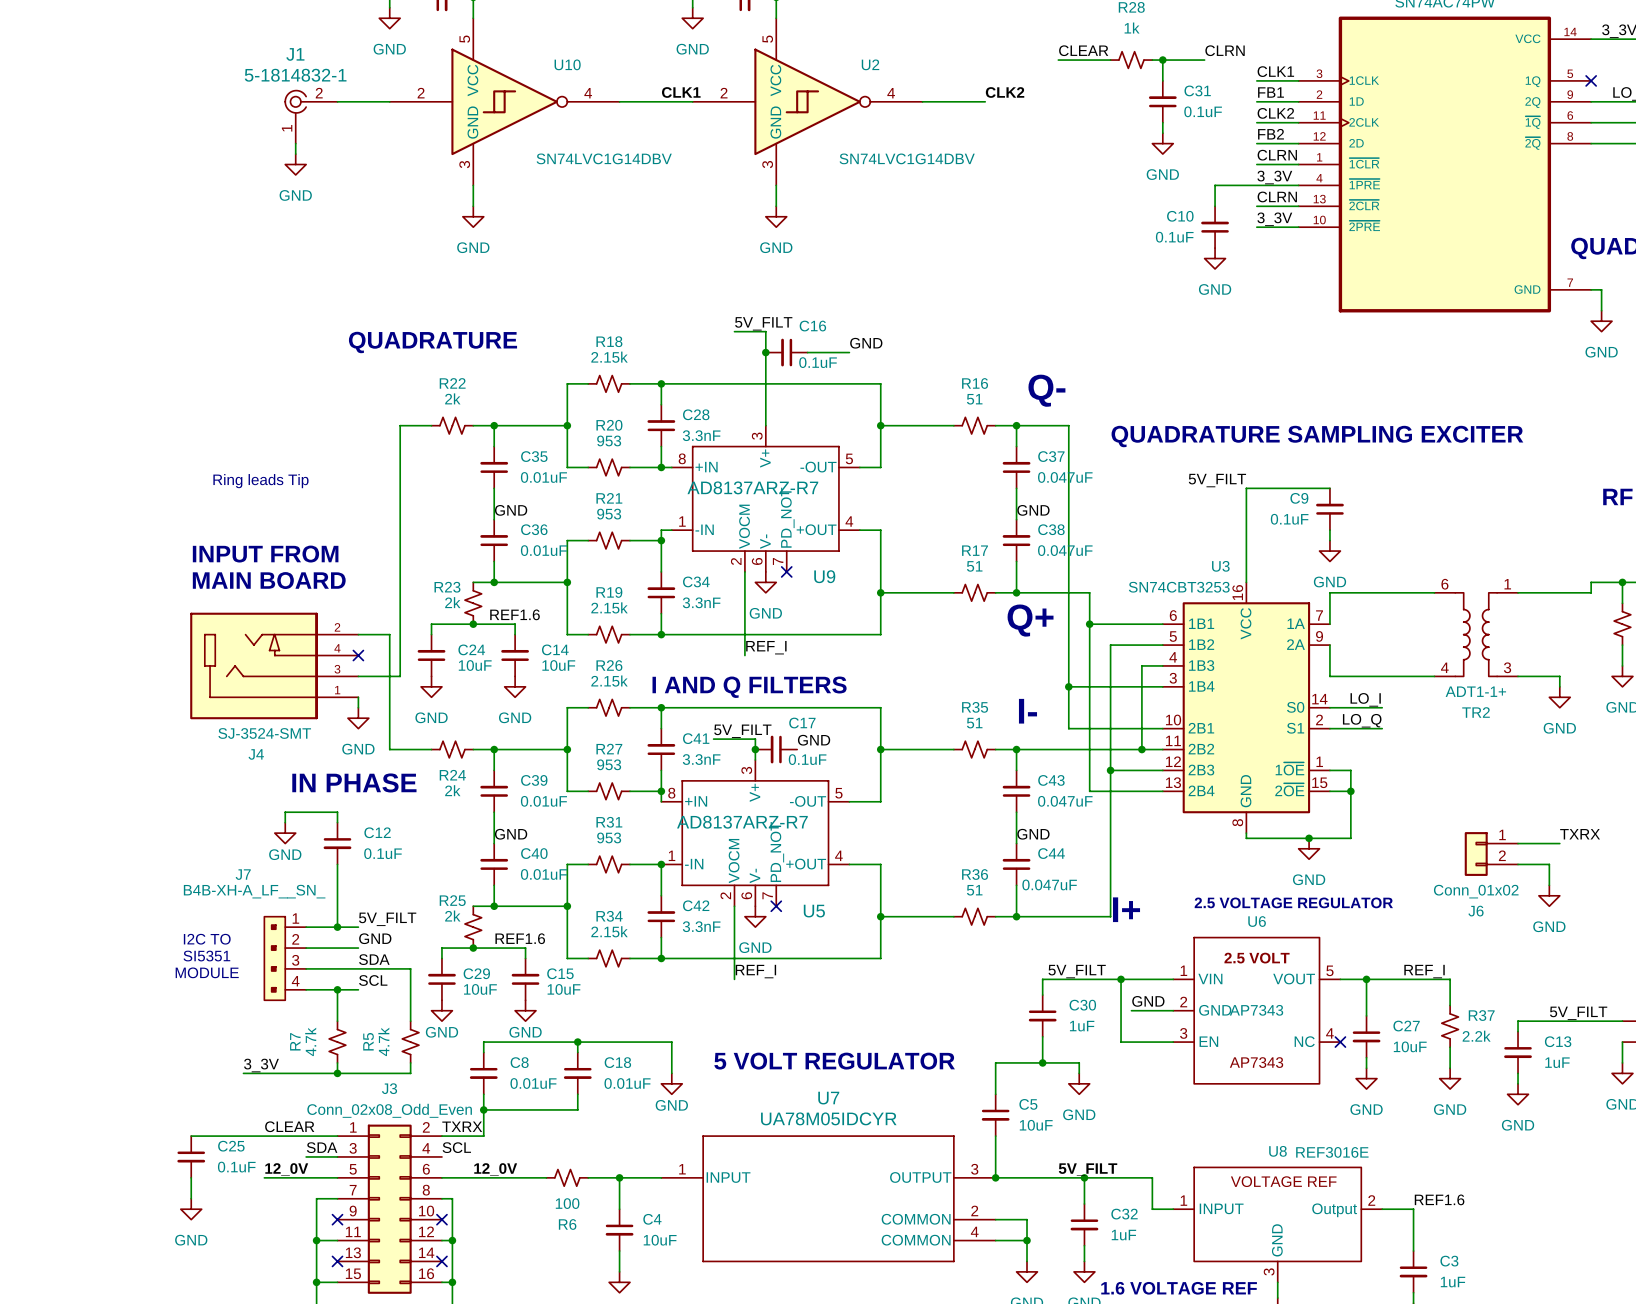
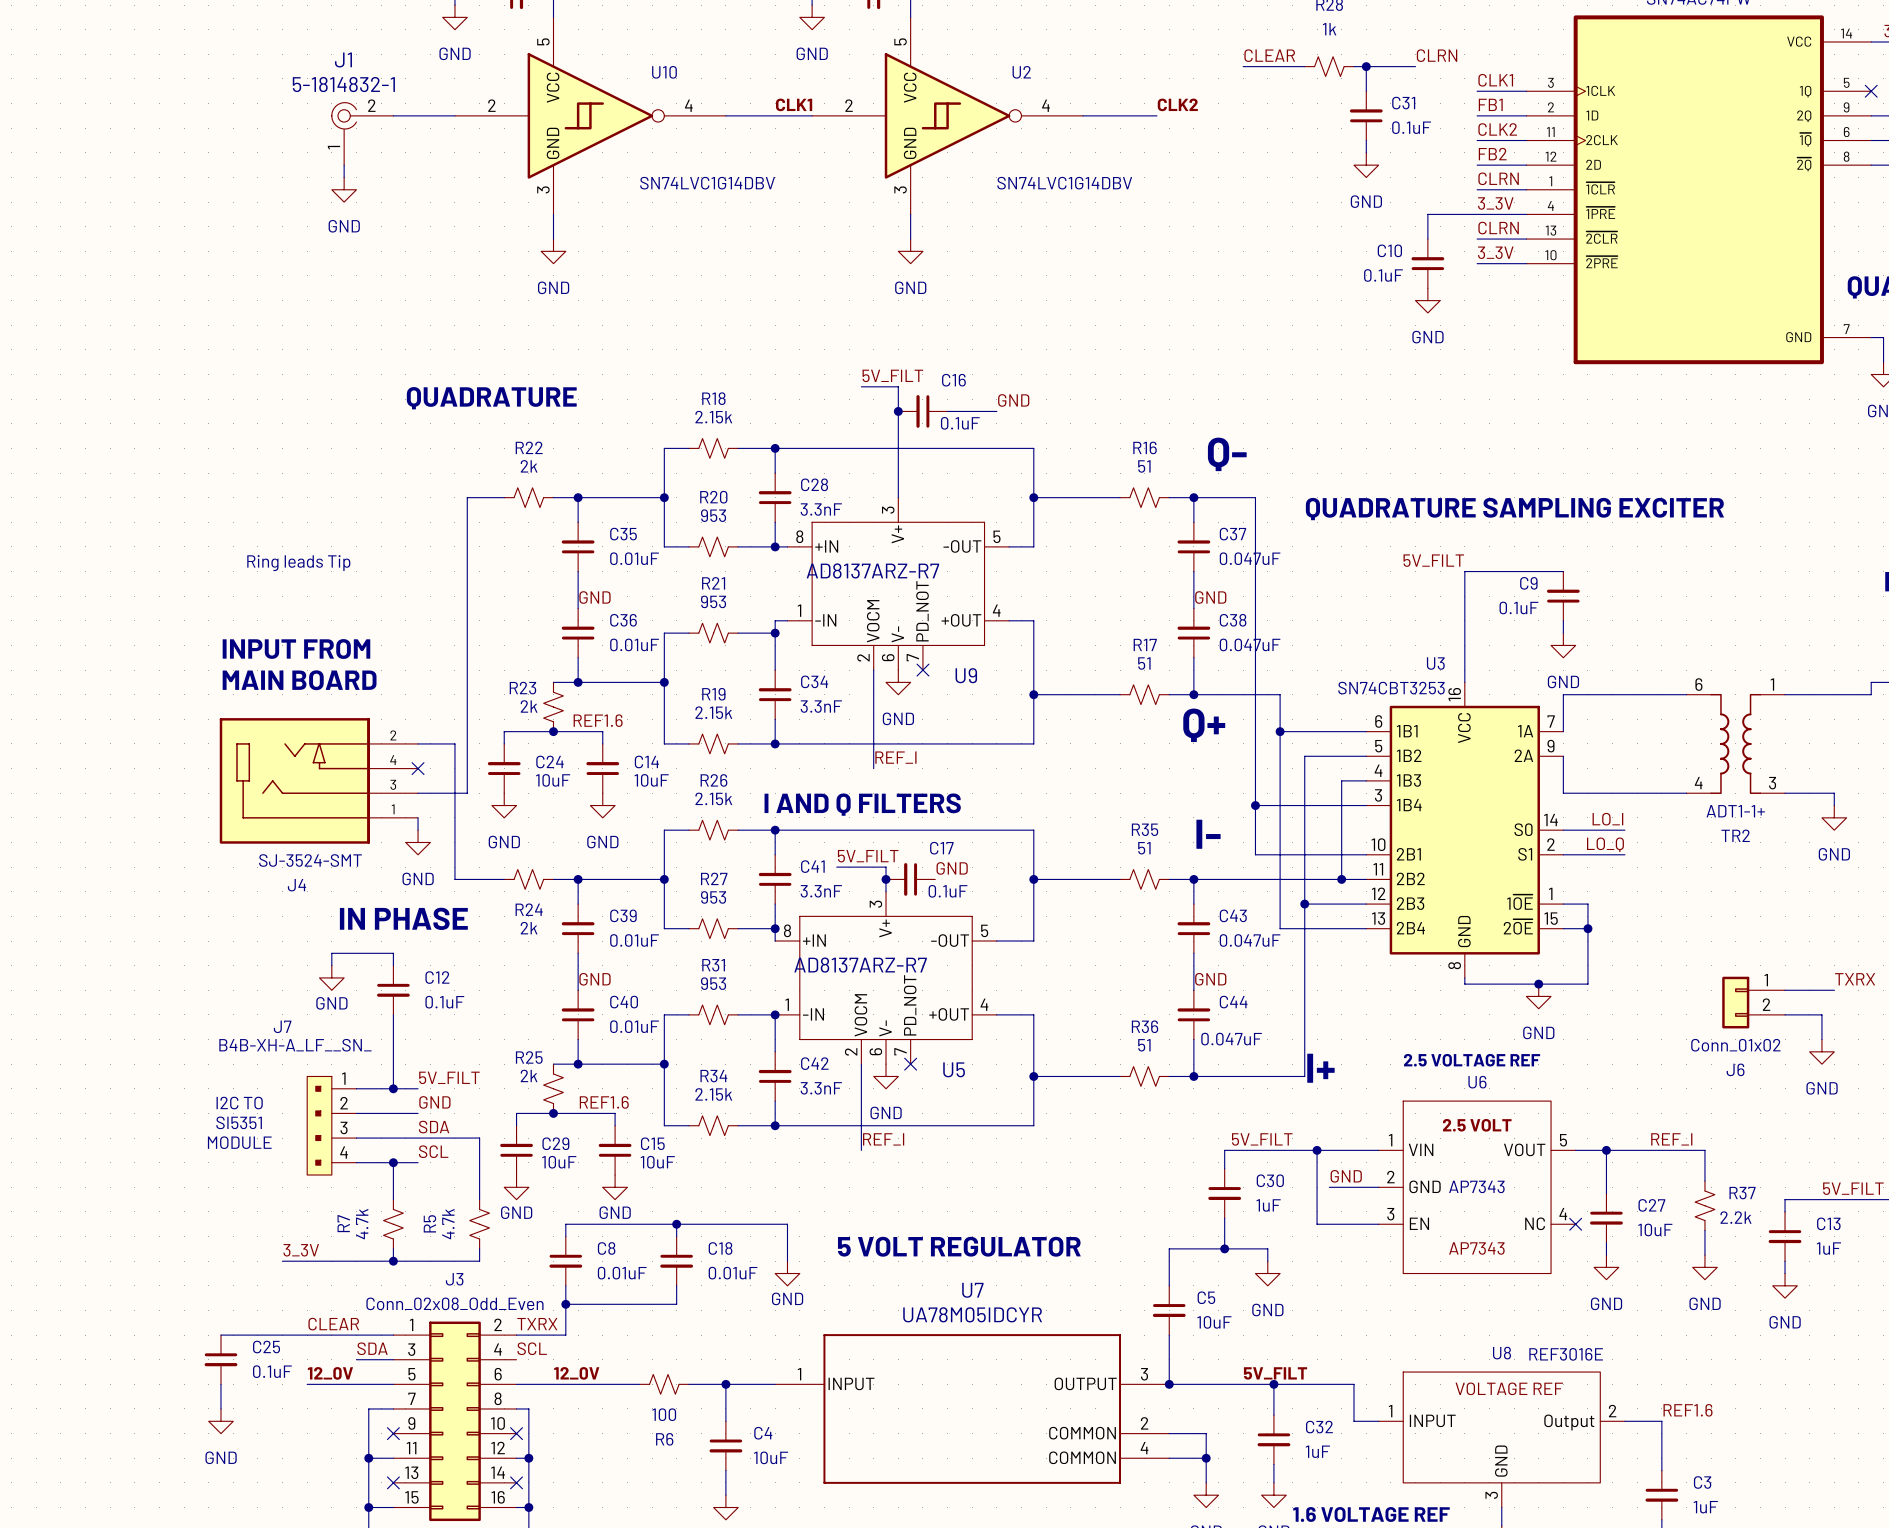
text: 2.5 VOLTAGE REGULATOR (1293, 902) -> 2.5 VOLTAGE REF (1472, 1060)

